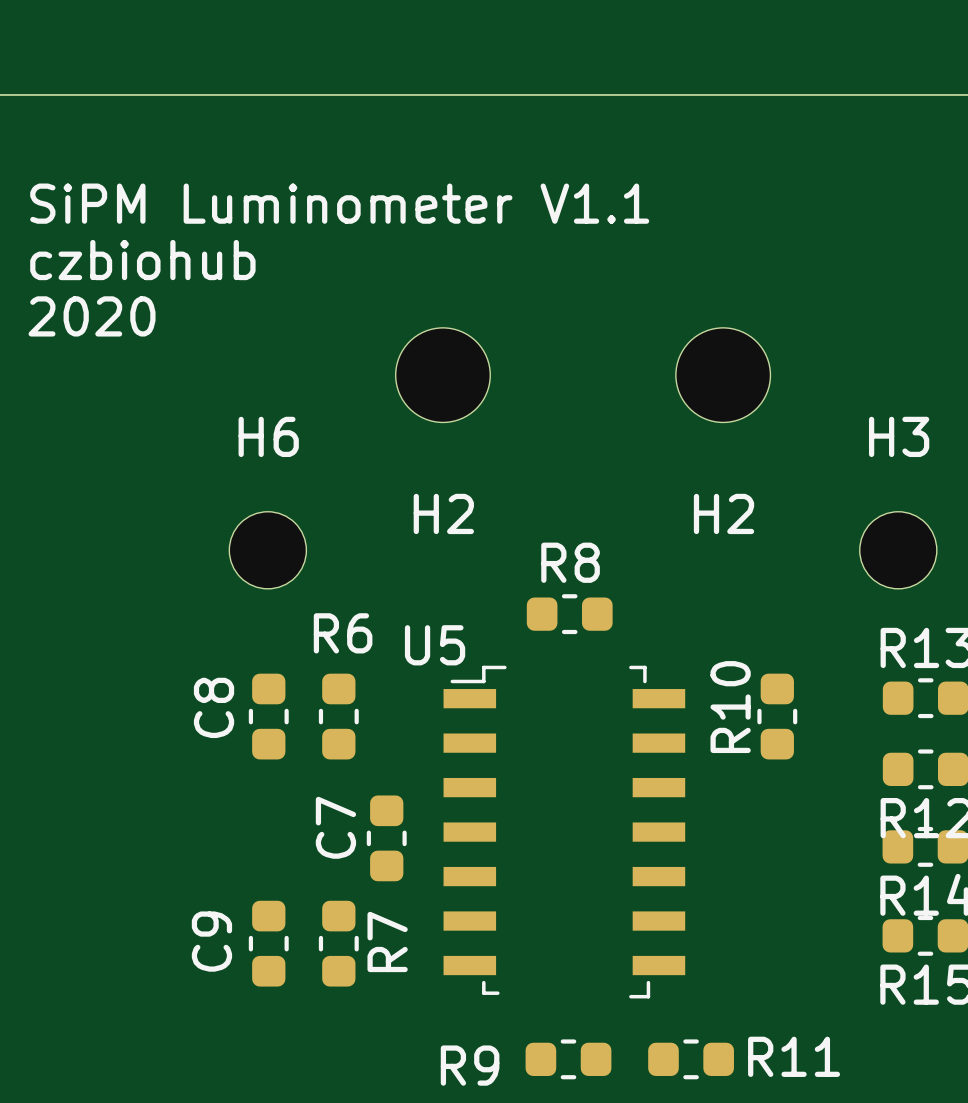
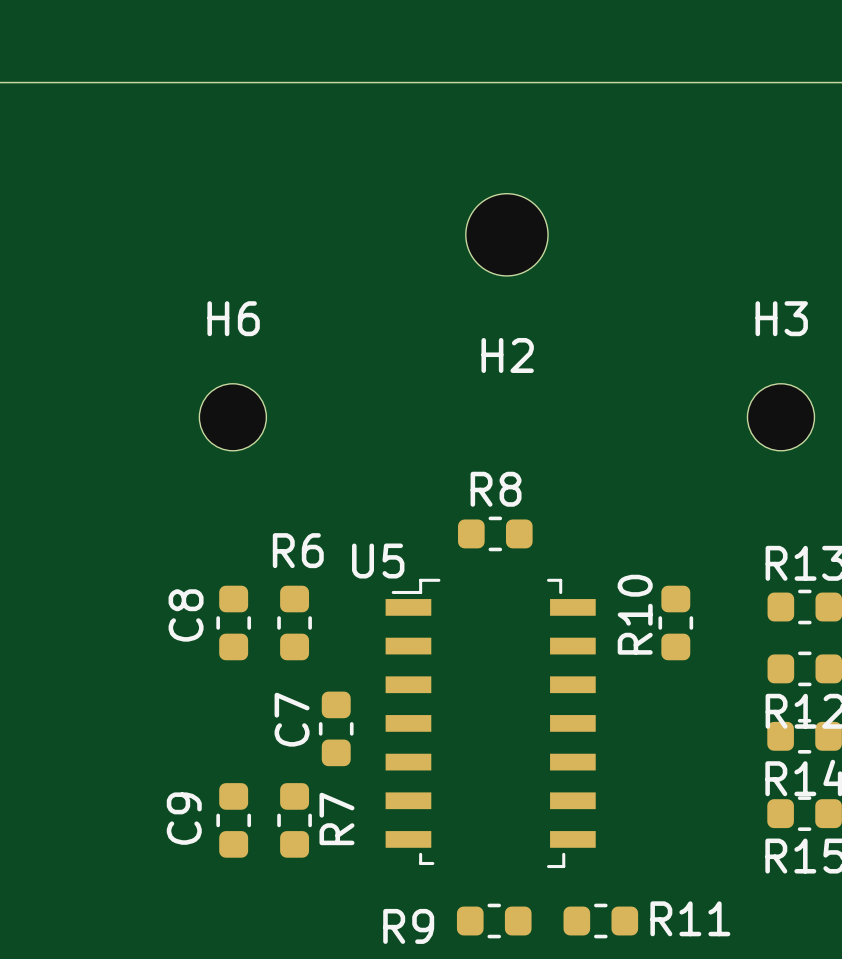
text: SiPM Luminometer V1.1 (339, 203) -> none
text: czbiohub (142, 260) -> none
H2: none -> (506, 234)
text: 2020 (92, 316) -> none
H2: (442, 375) -> none
H2: (723, 375) -> none
H6 position: (267, 550) -> (232, 417)
H3 position: (898, 550) -> (780, 417)

